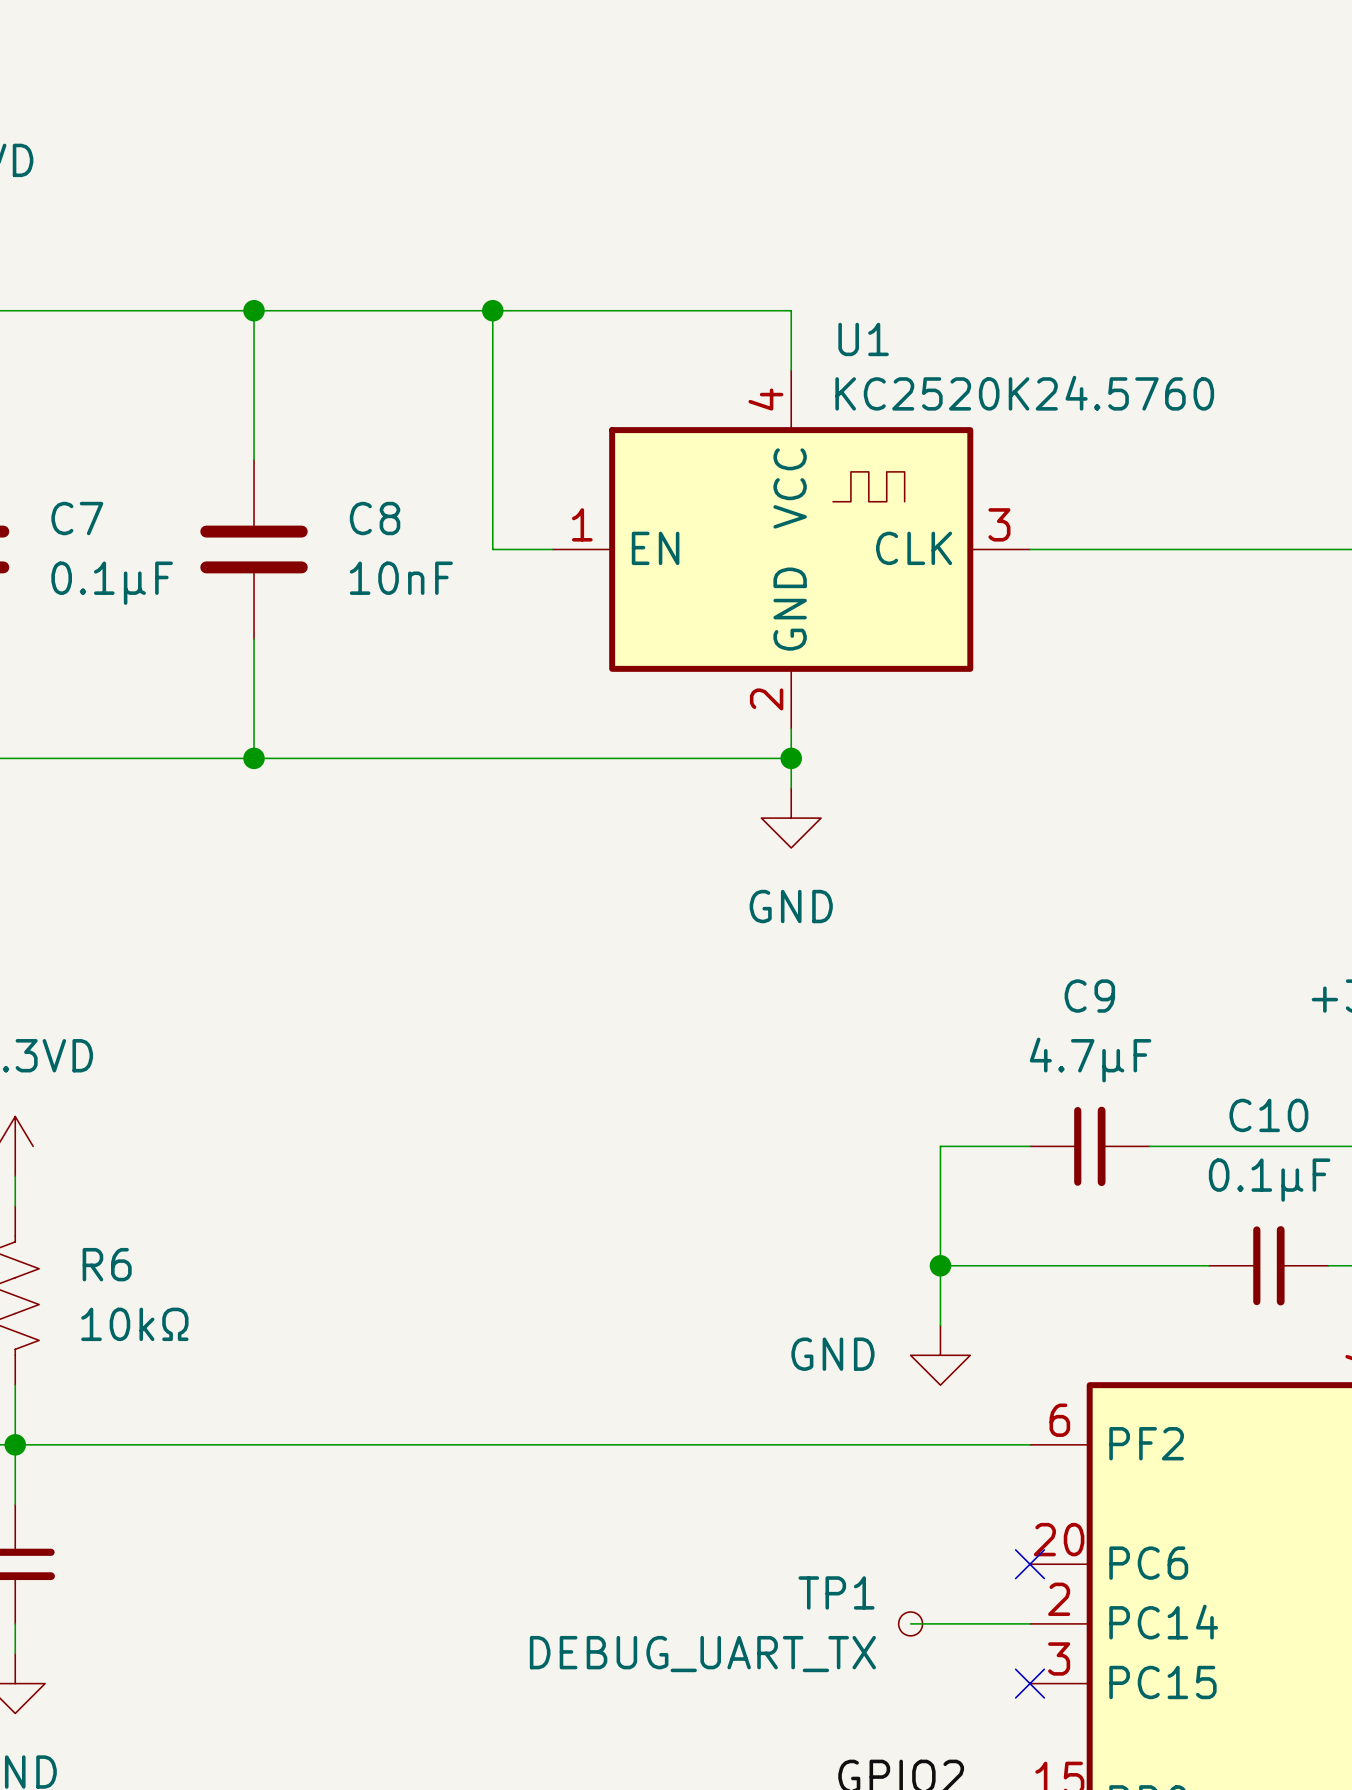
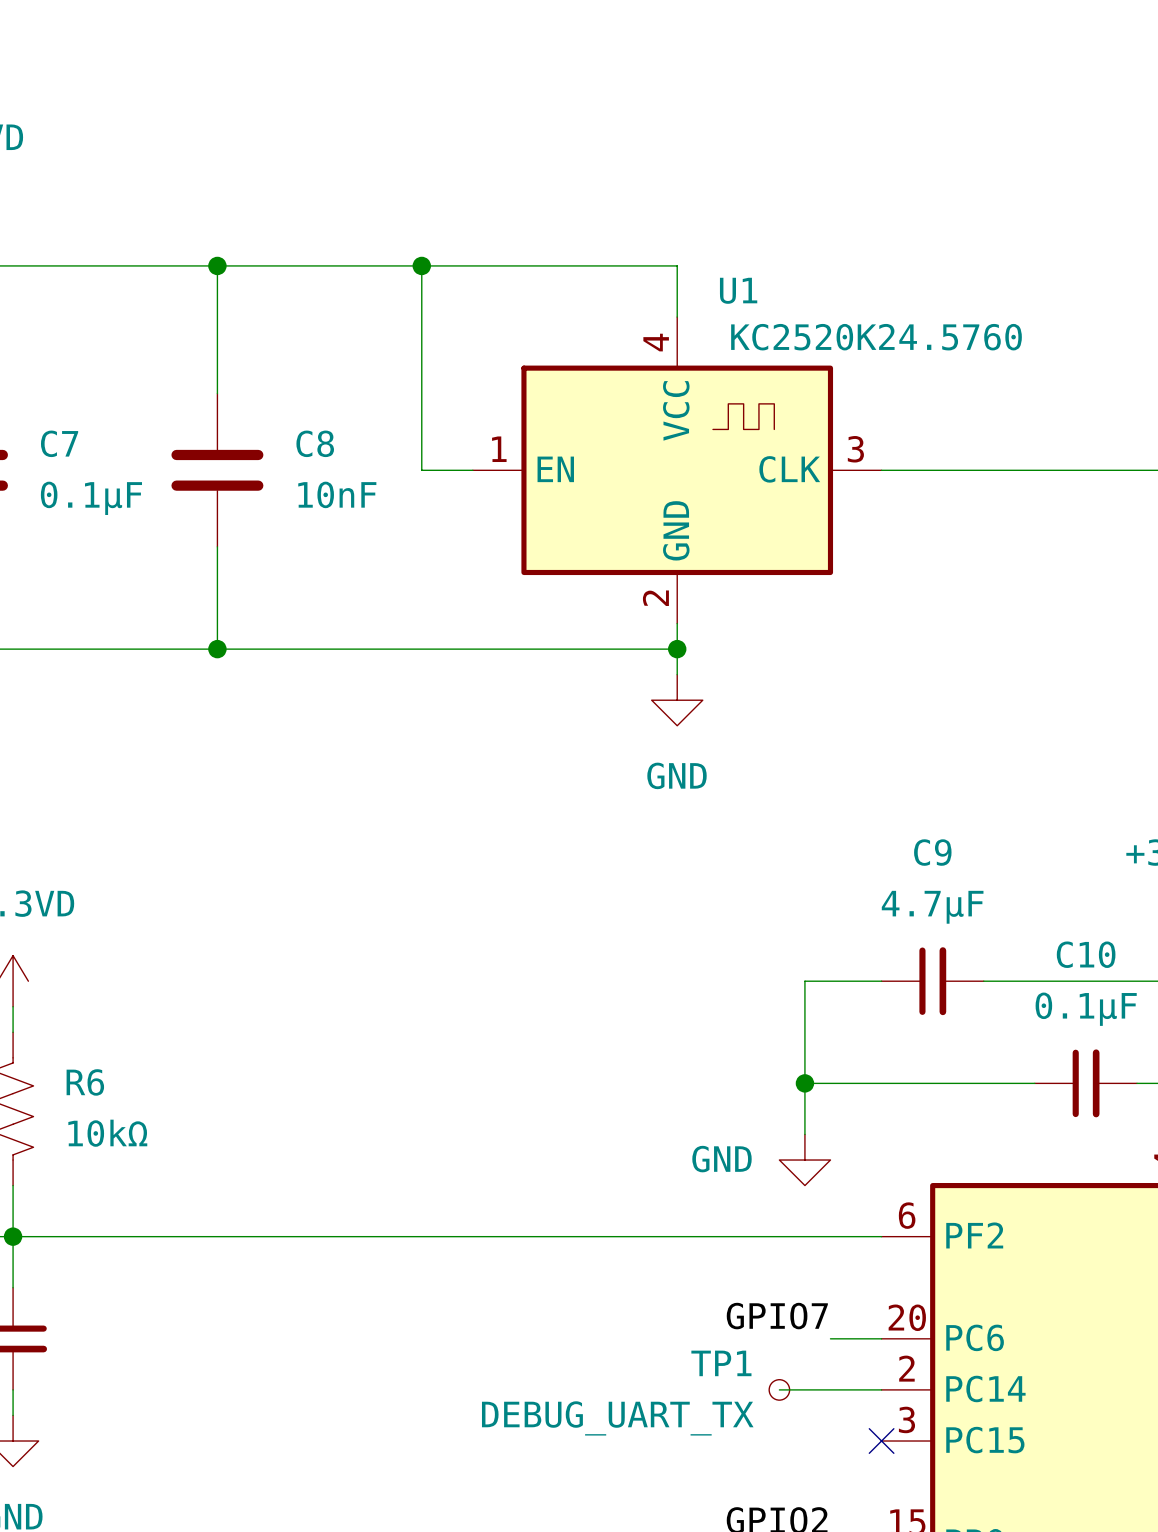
label: none -> GPIO7 (777, 1316)
wire: none -> (830, 1338) (881, 1338)
no-connect mark: (1029, 1564) -> none

